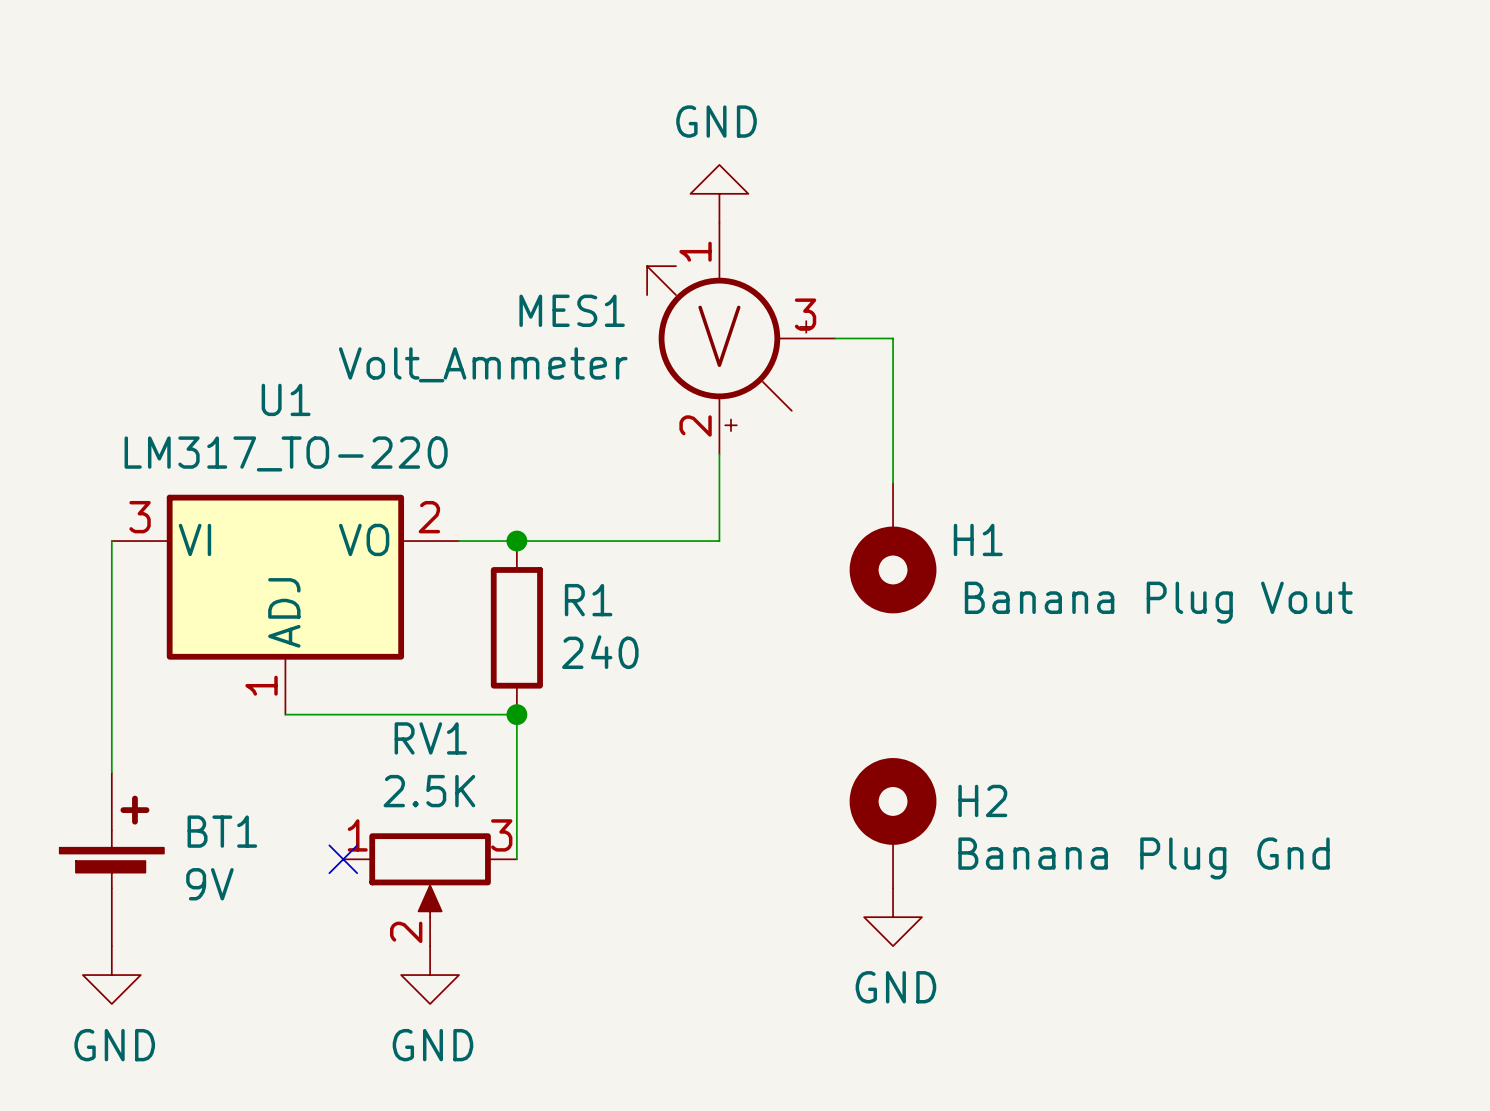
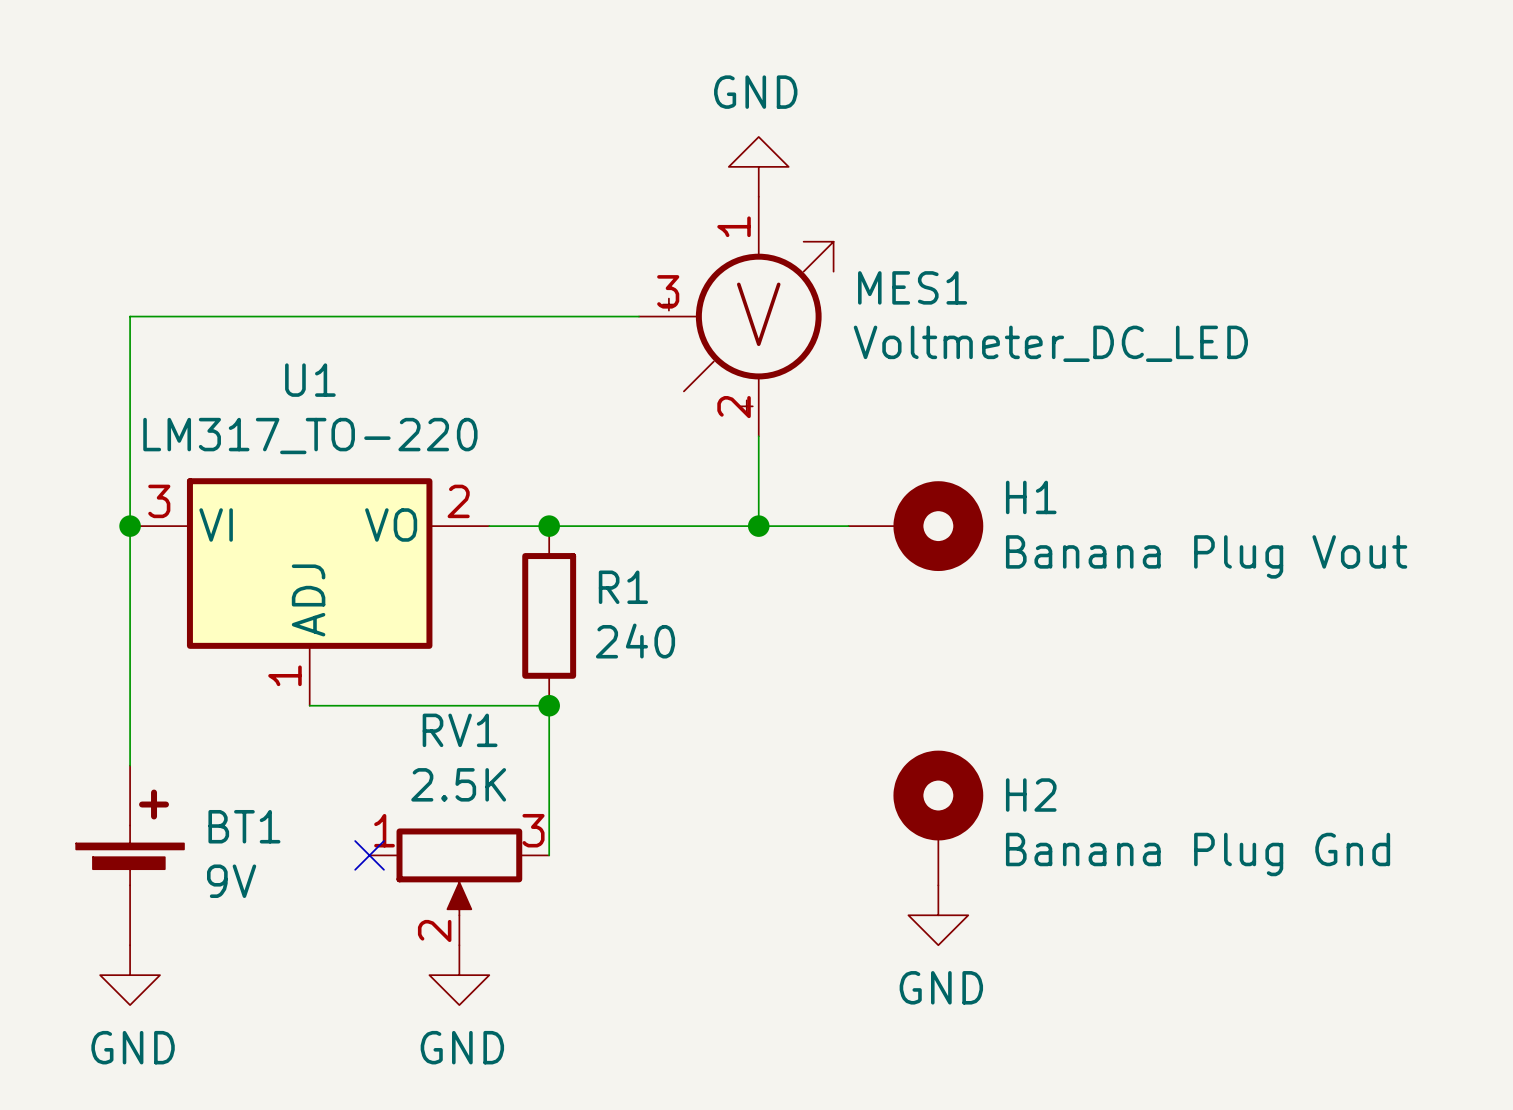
wire: none -> (638, 316) (130, 316) (130, 526)
wire: (835, 338) (893, 338) (893, 483) -> none
MES1 flip: as is (729, 348) -> left-right (748, 327)
MES1 value: Volt_Ammeter (483, 364) -> Voltmeter_DC_LED (1050, 343)
junction: none -> (130, 526)
wire: none -> (758, 526) (848, 526)
junction: none -> (758, 526)
H1 rotation: 0° (893, 569) -> 90° counterclockwise (938, 526)
H1 value position: Banana Plug Vout (1158, 602) -> Banana Plug Vout (1206, 556)

